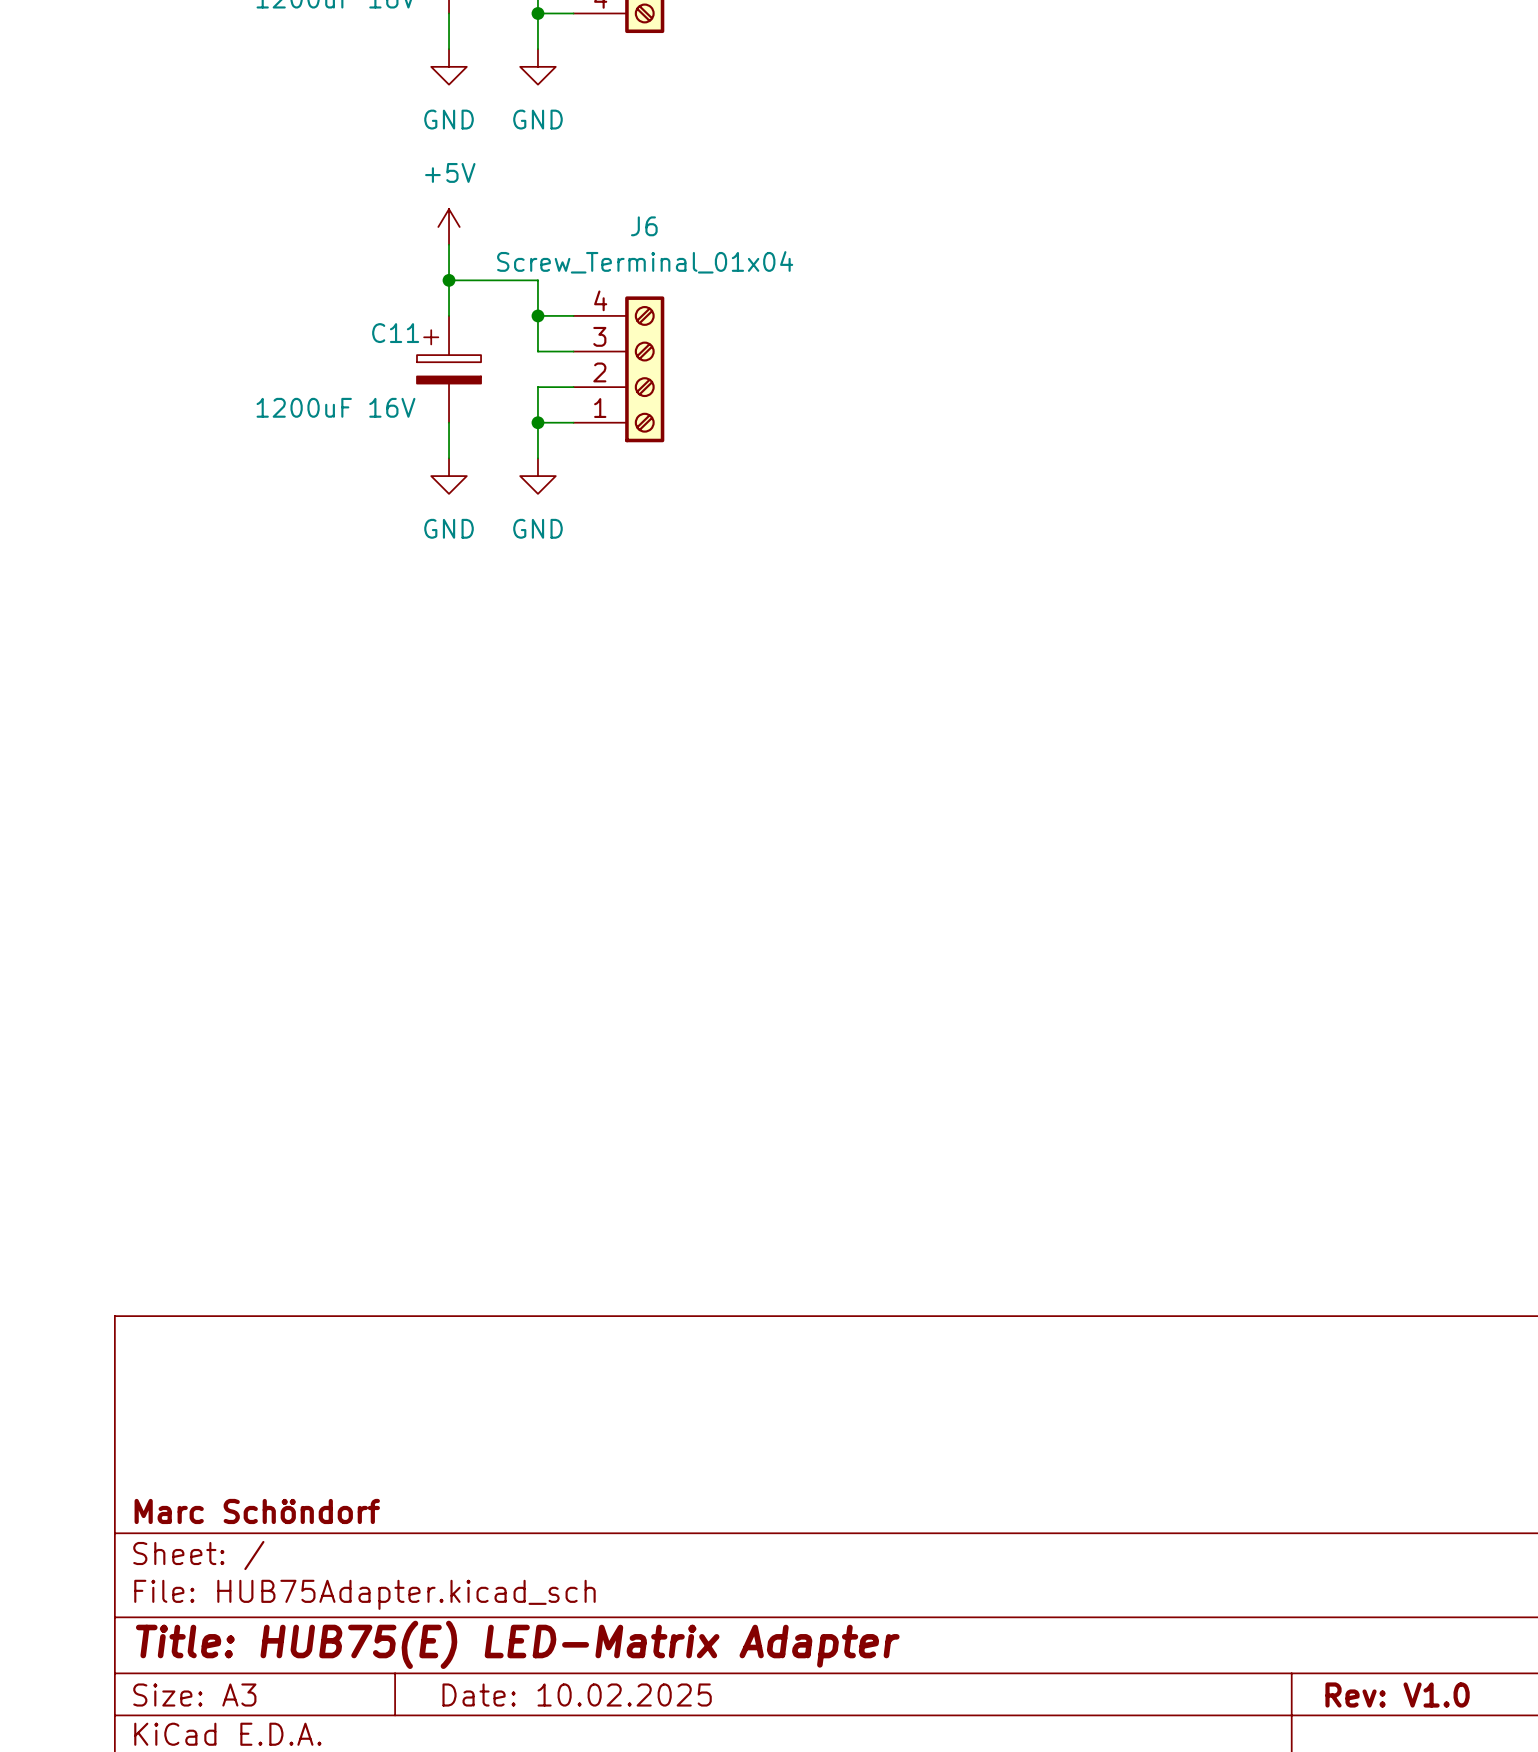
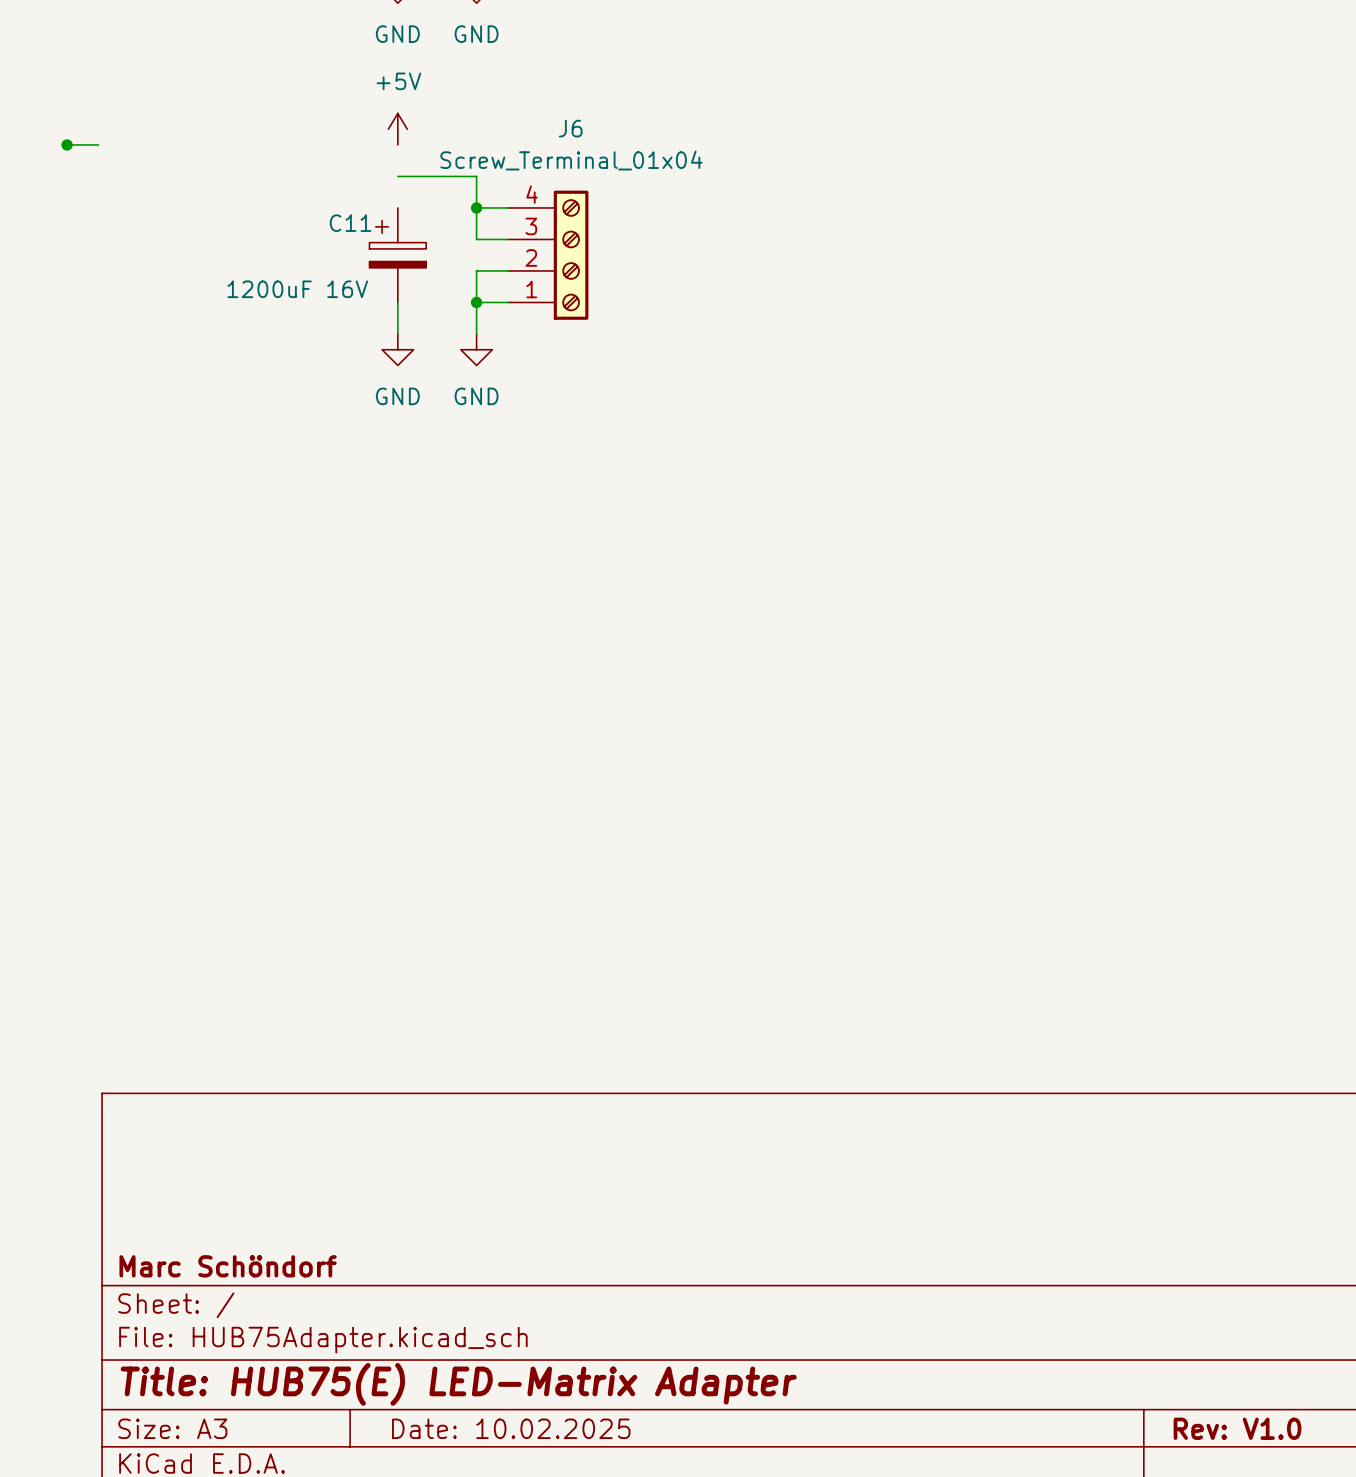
wire: none -> (67, 144) (98, 144)
junction: none -> (67, 144)
wire: (449, 244) (449, 315) -> none
junction: (449, 280) -> none

